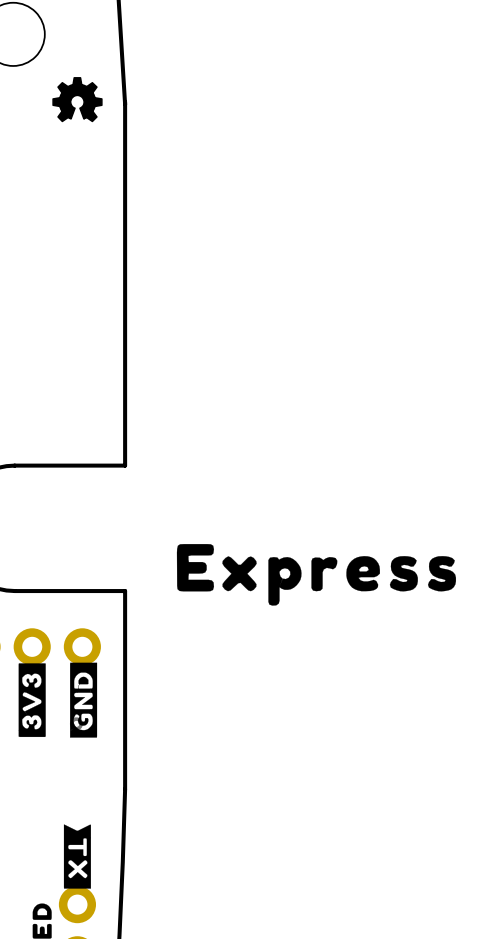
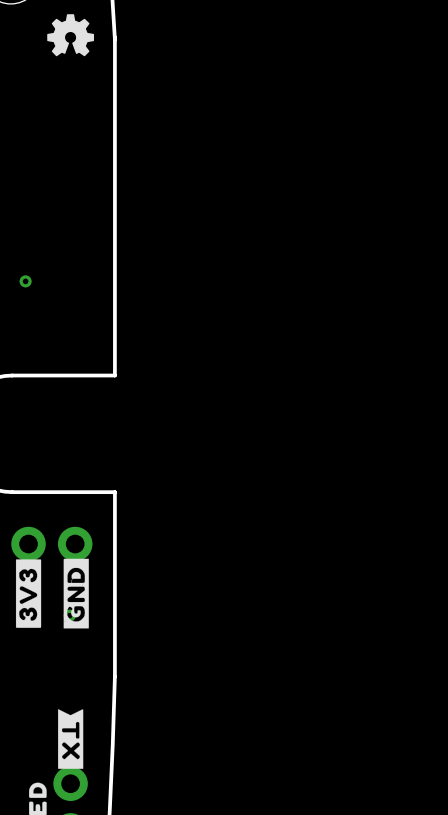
via: none -> (25, 281)
drawing: [176, 544, 457, 606] -> none

